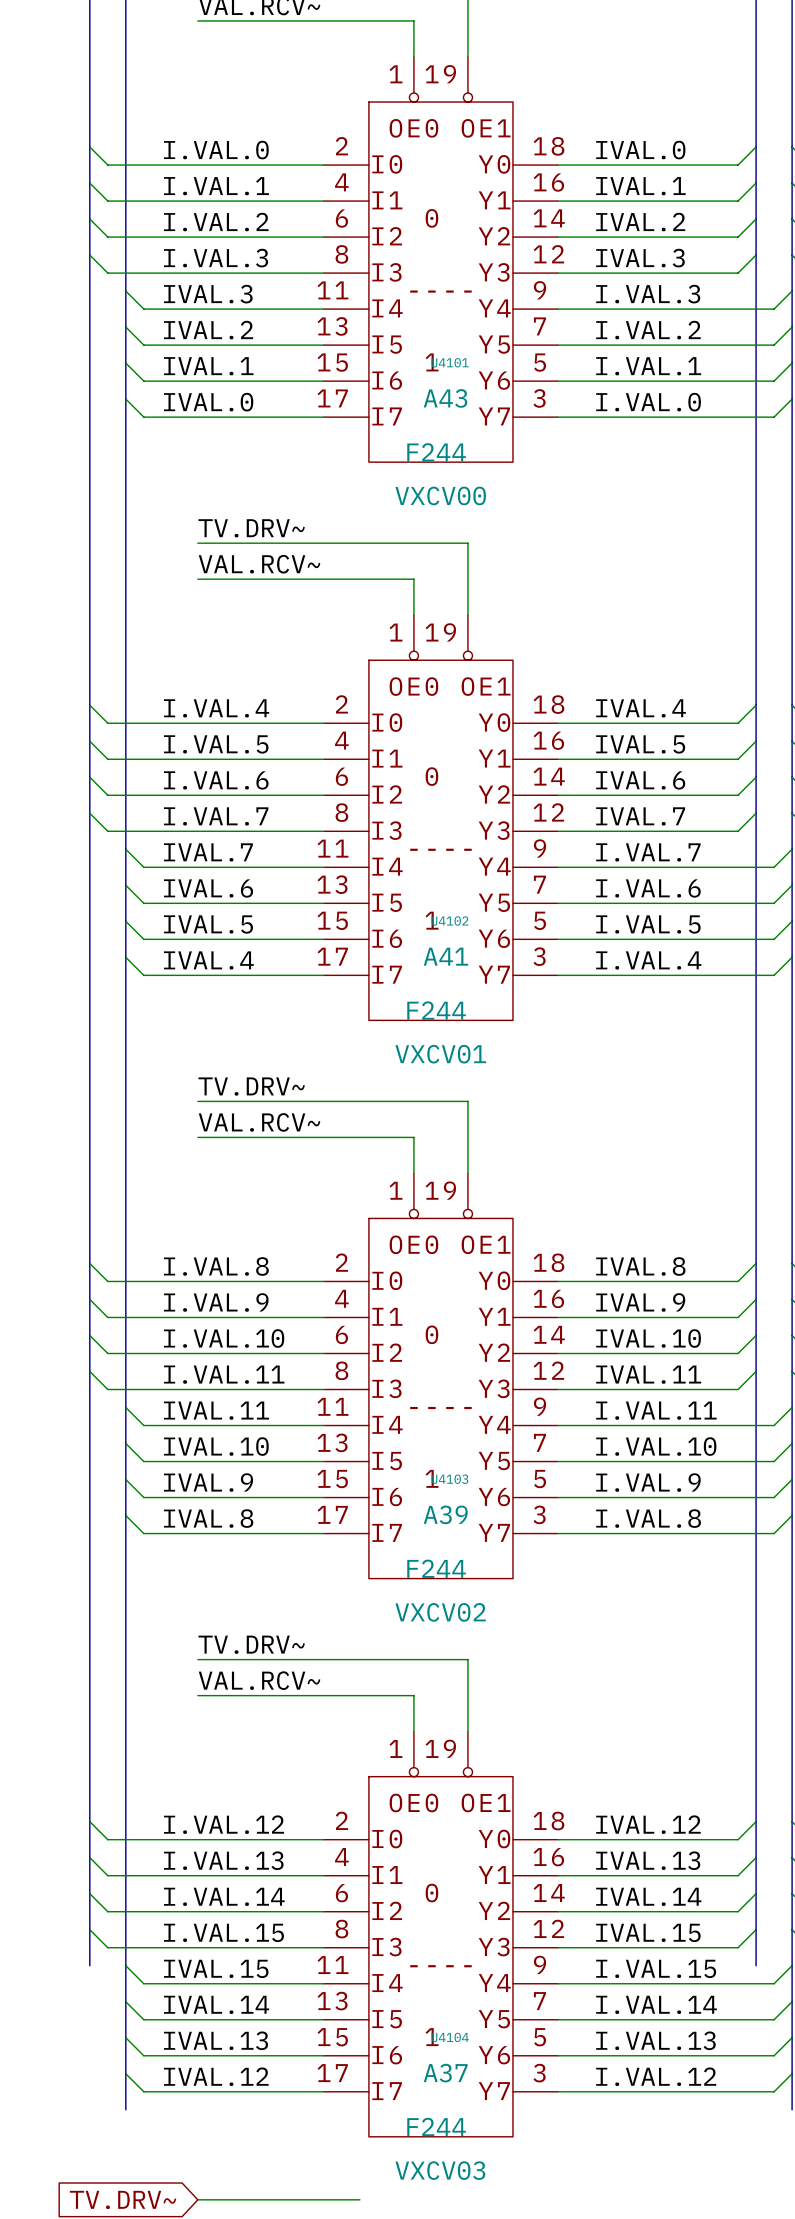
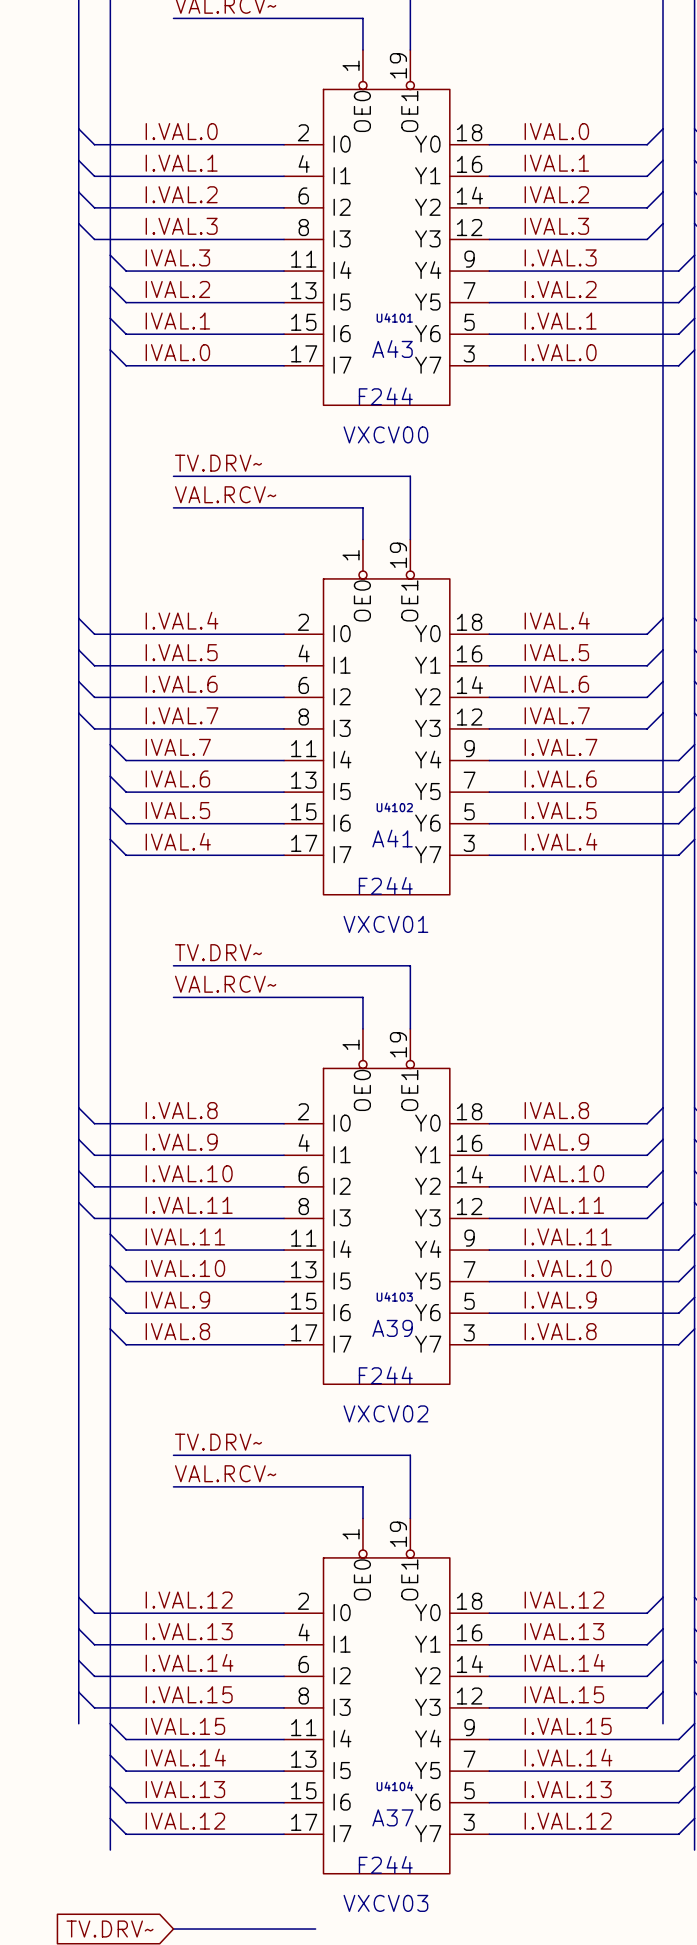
U4101 symbol: [323, 57, 559, 463] -> [284, 49, 490, 406]
U4102 symbol: [323, 615, 559, 1021] -> [284, 539, 490, 895]
U4103 symbol: [323, 1173, 559, 1579] -> [284, 1028, 490, 1385]
U4104 symbol: [323, 1731, 559, 2137] -> [284, 1518, 490, 1874]

